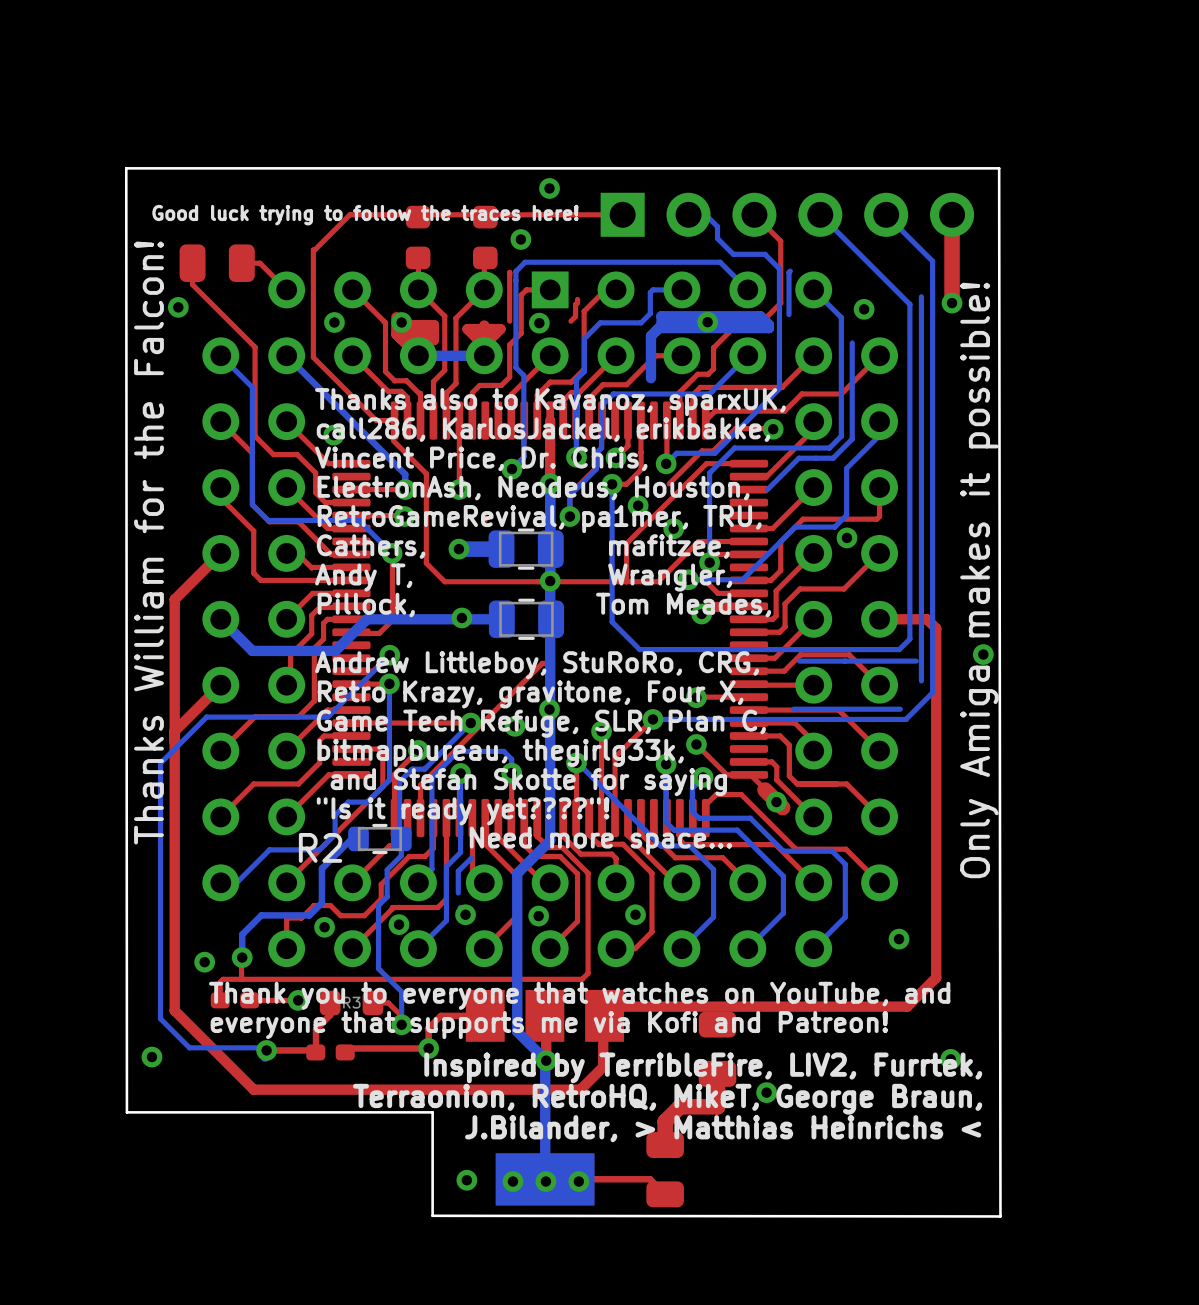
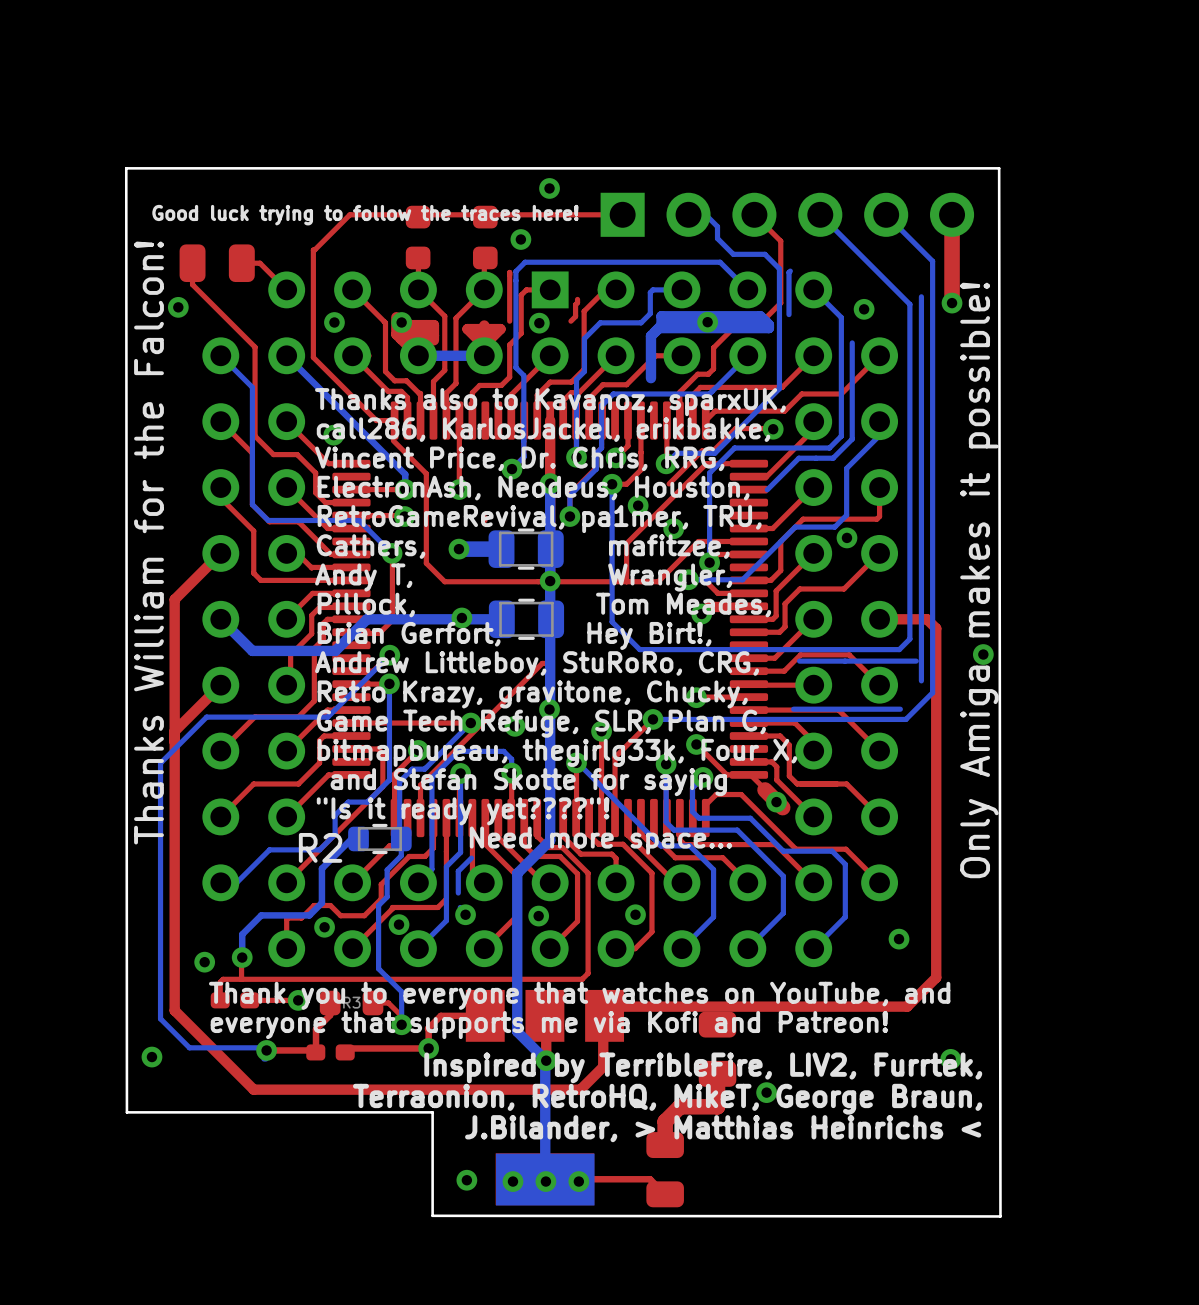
text: Vincent Price, Dr. Chris, (481, 458) -> Vincent Price, Dr. Chris, RRG, (519, 458)
text: none -> Brian Gerfort, Hey Birt!, (514, 635)
text: Retro Krazy, gravitone, Four X, (530, 694) -> Retro Krazy, gravitone, Chucky, (532, 694)
text: bitmapbureau, thegirlg33k, (500, 752) -> bitmapbureau, thegirlg33k, Four X, (557, 752)

